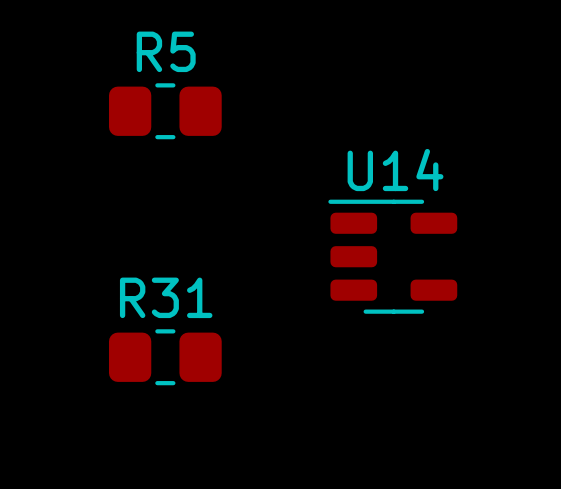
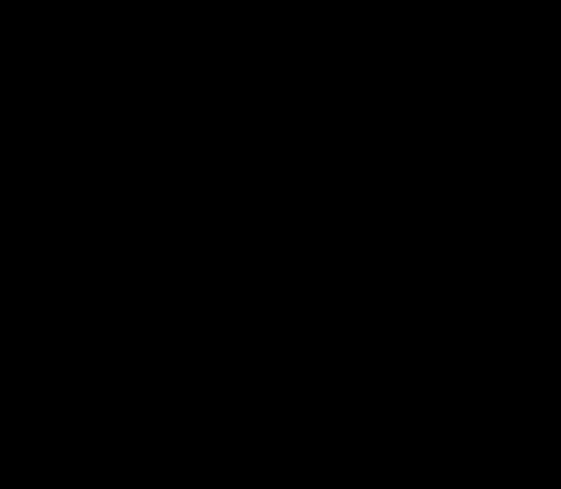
R5: (165, 111) -> none
U14: (392, 256) -> none
R31: (165, 357) -> none

